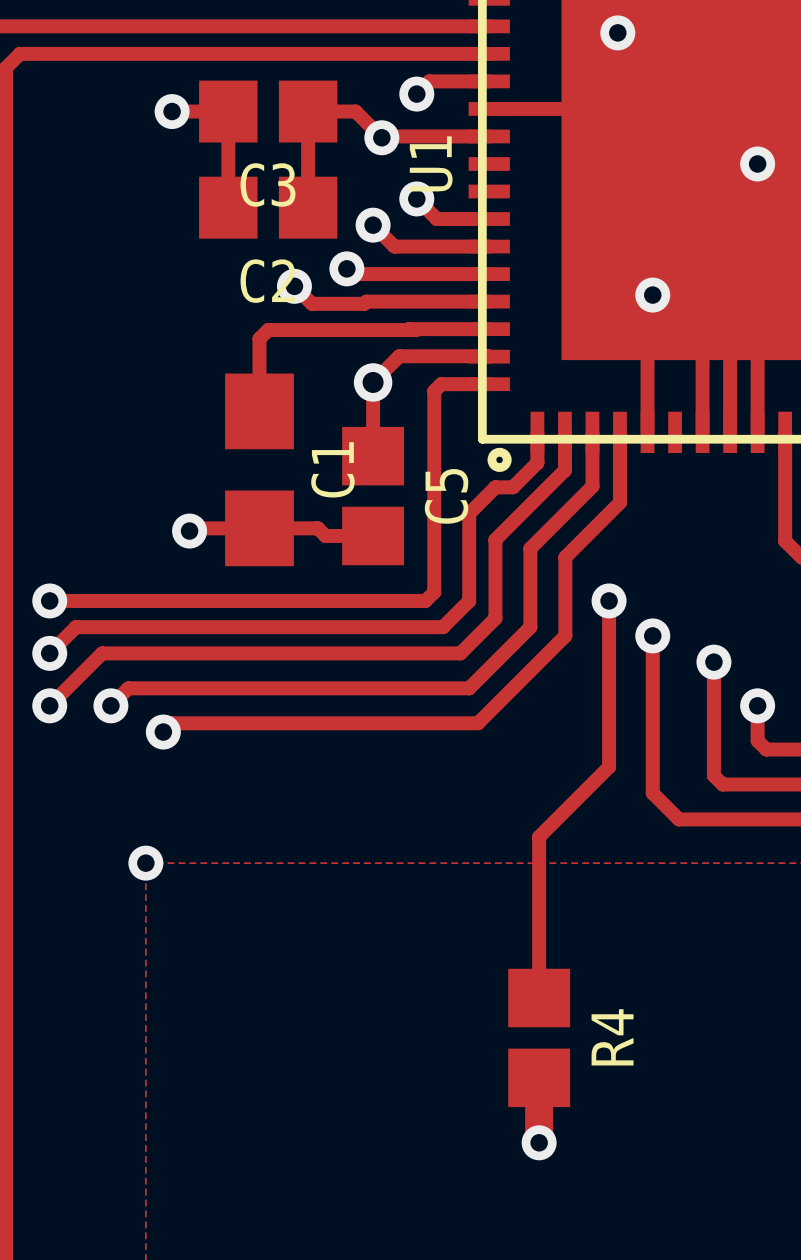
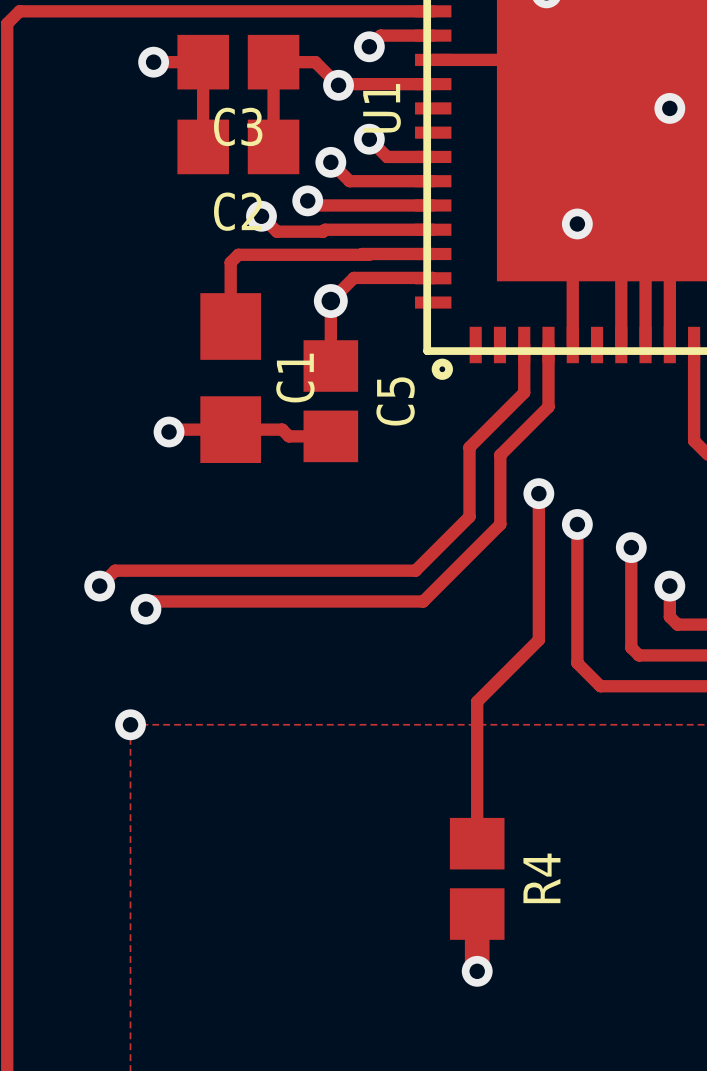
track: (489, 384) (441, 384) (434, 391) (434, 592) (425, 600) (49, 600) -> none
track: (537, 432) (537, 462) (512, 487) (495, 487) (469, 513) (469, 600) (443, 627) (75, 627) (49, 653) -> none
track: (564, 432) (564, 470) (495, 539) (495, 618) (460, 653) (102, 653) (49, 705) -> none
via: (49, 600) -> none
via: (49, 653) -> none
via: (49, 705) -> none

